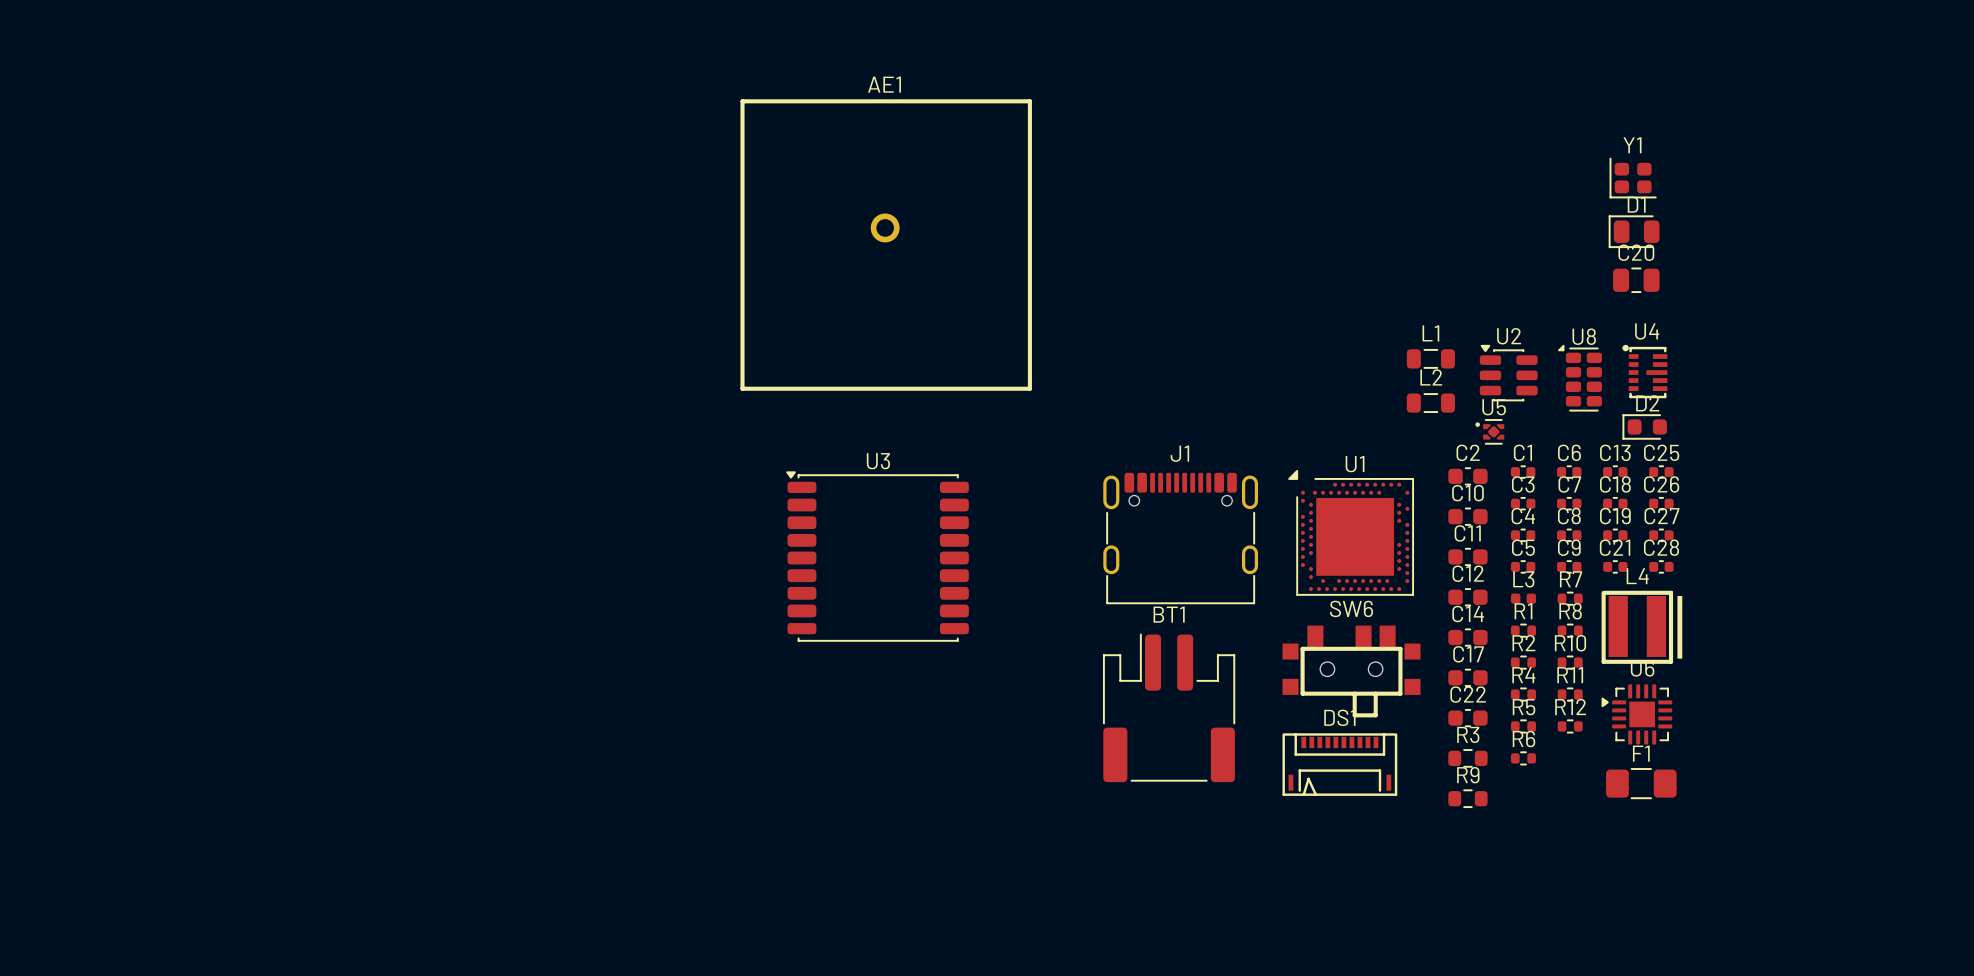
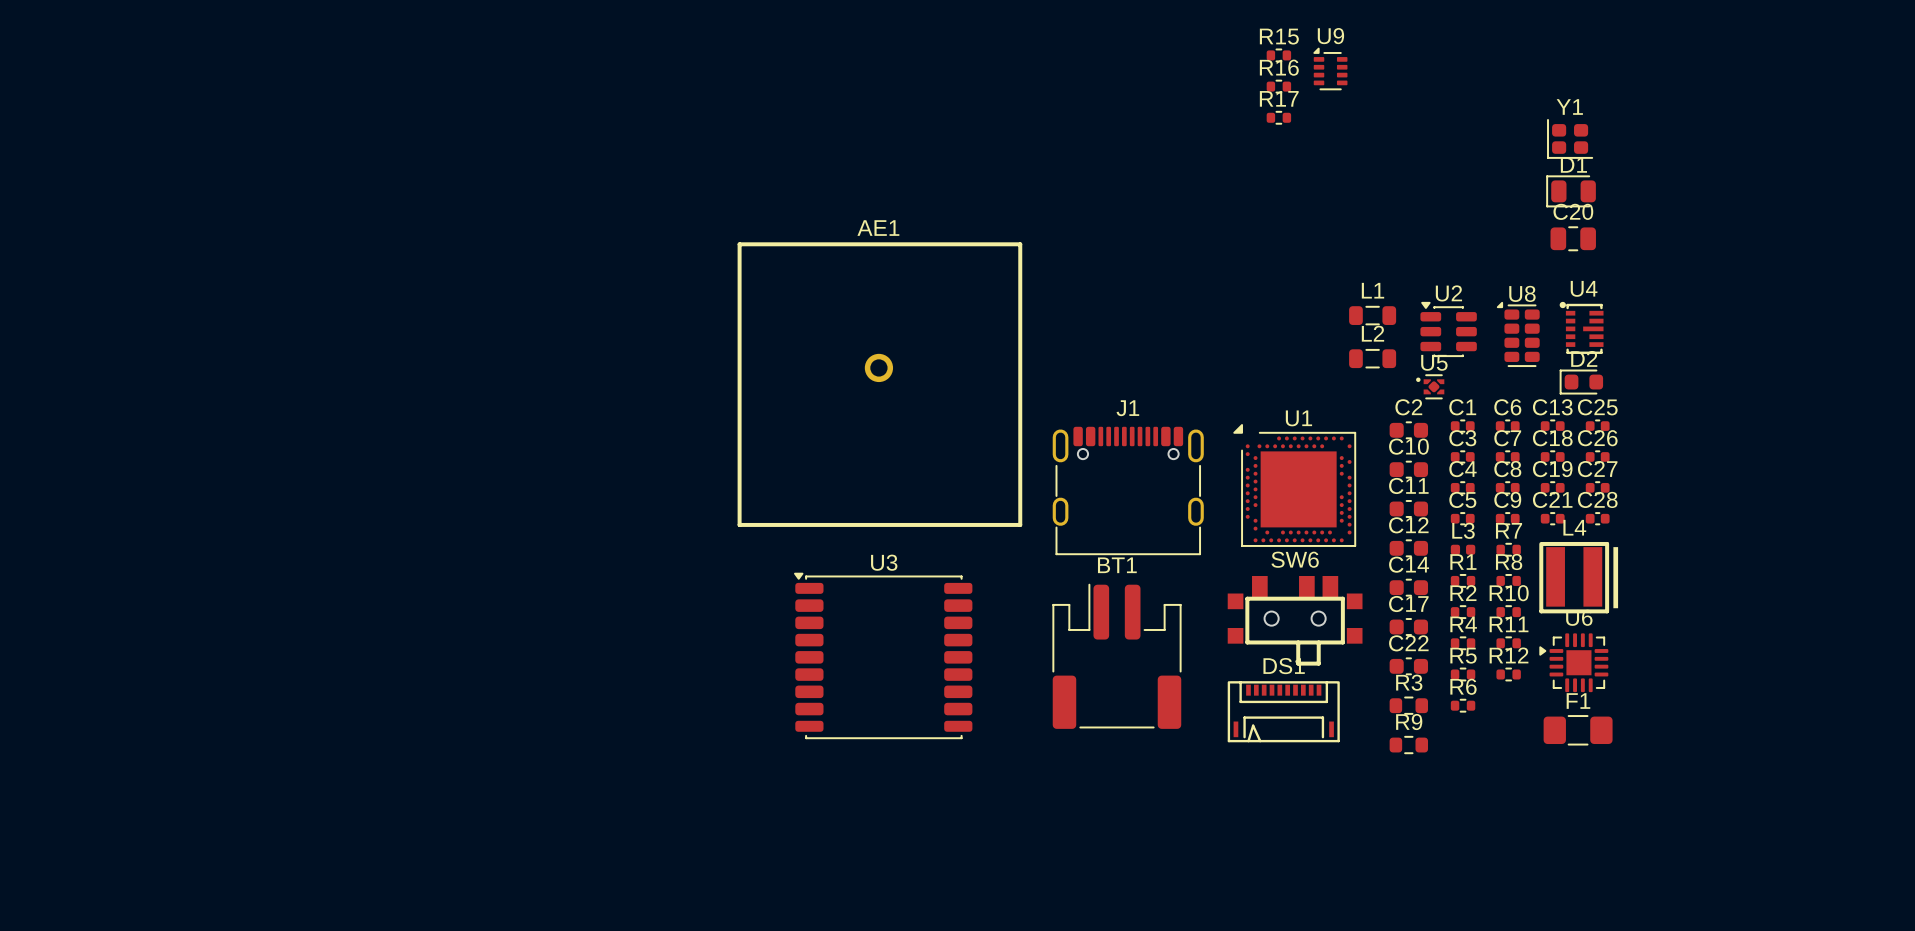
R15: none -> (1278, 55)
U9: none -> (1330, 68)
R16: none -> (1278, 86)
R17: none -> (1278, 117)
AE1 position: (886, 245) -> (879, 384)
U3 position: (877, 556) -> (883, 655)

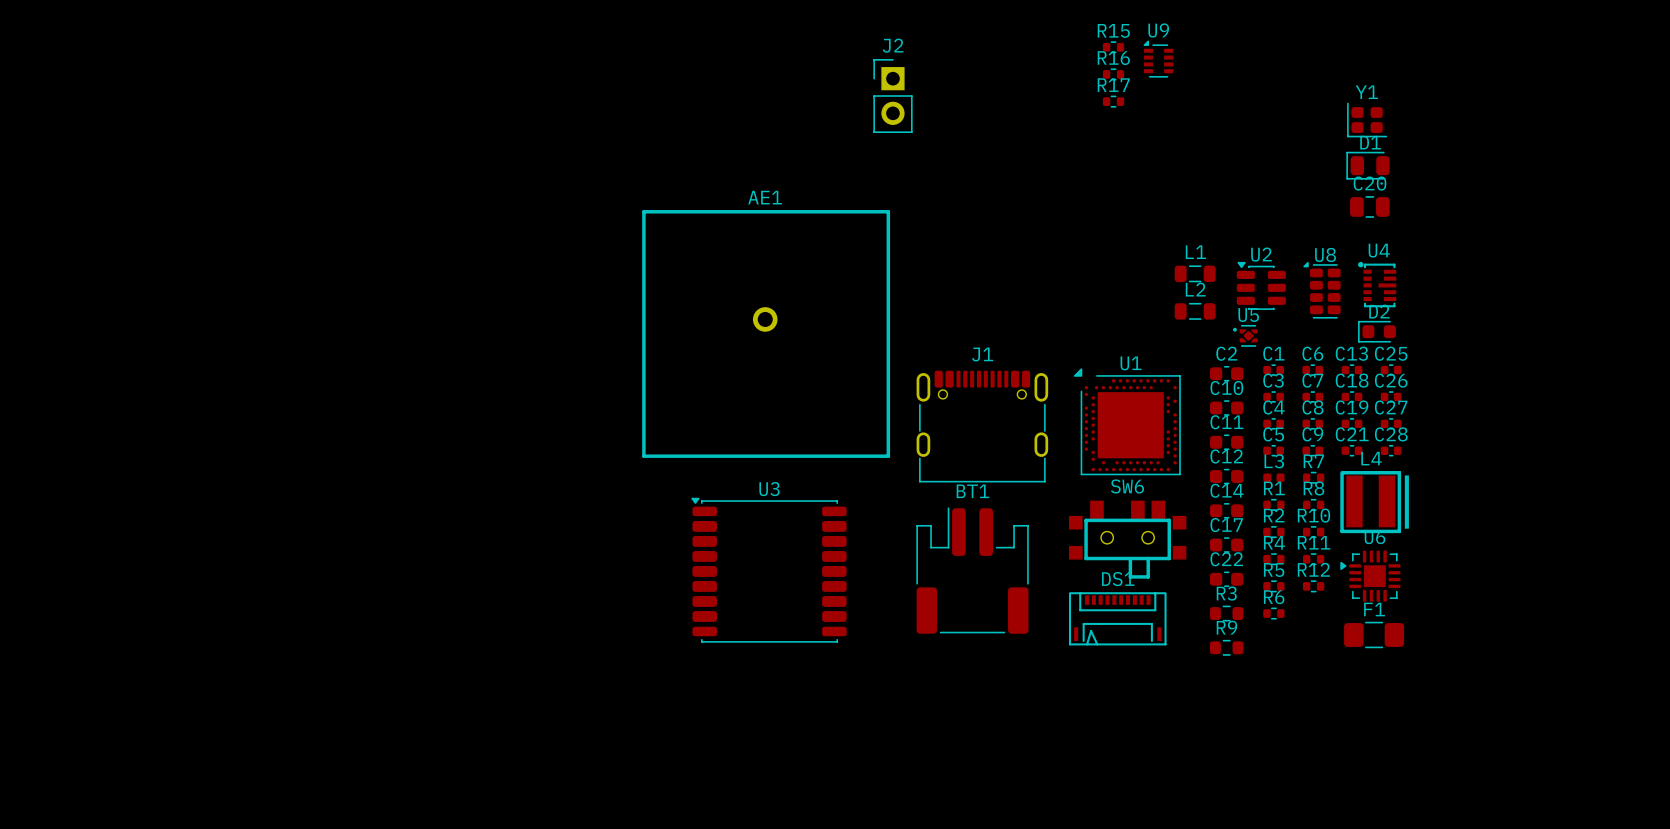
J2: none -> (892, 96)

